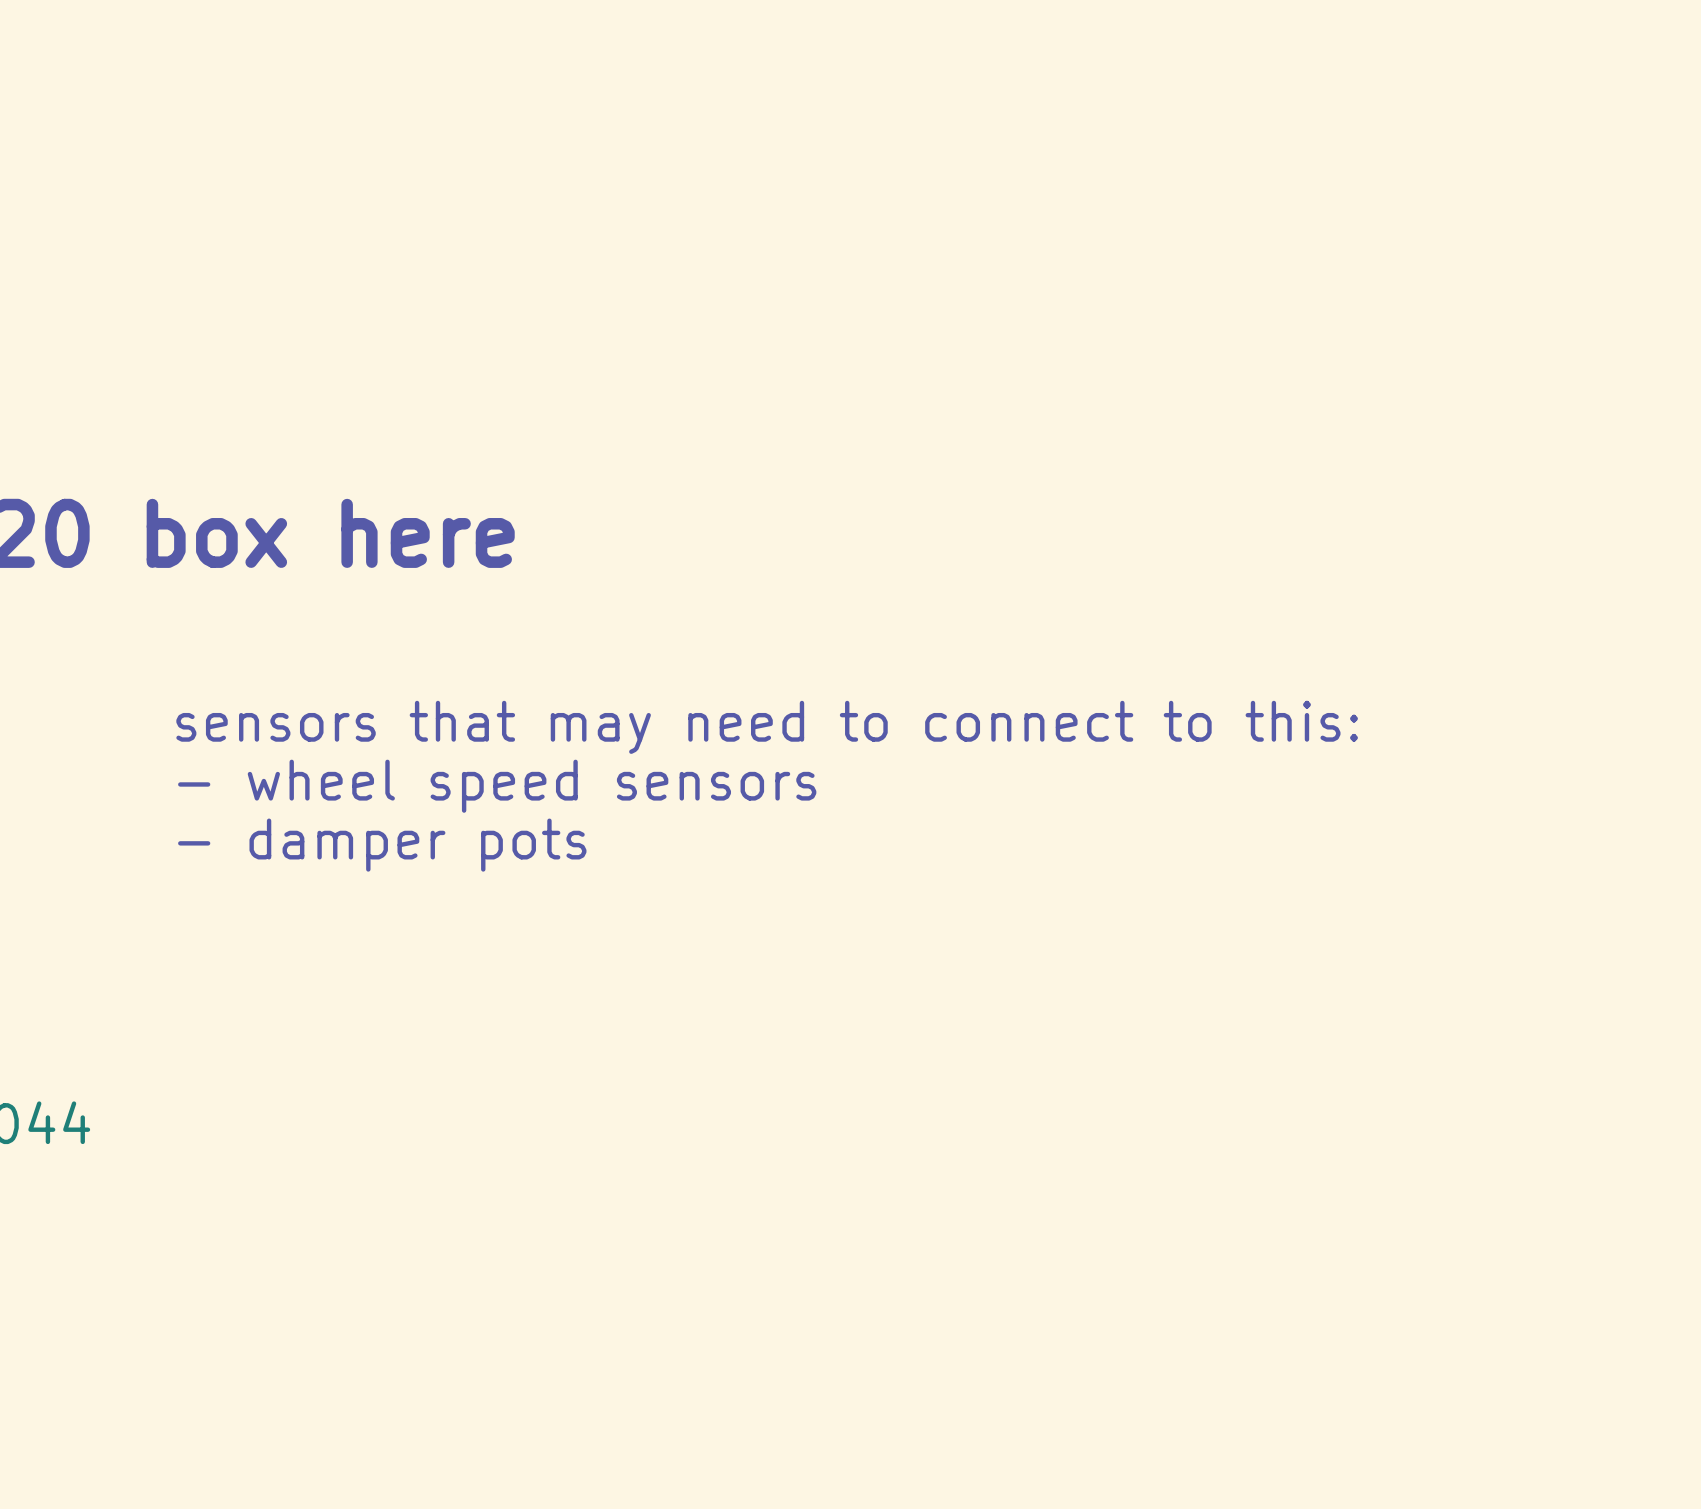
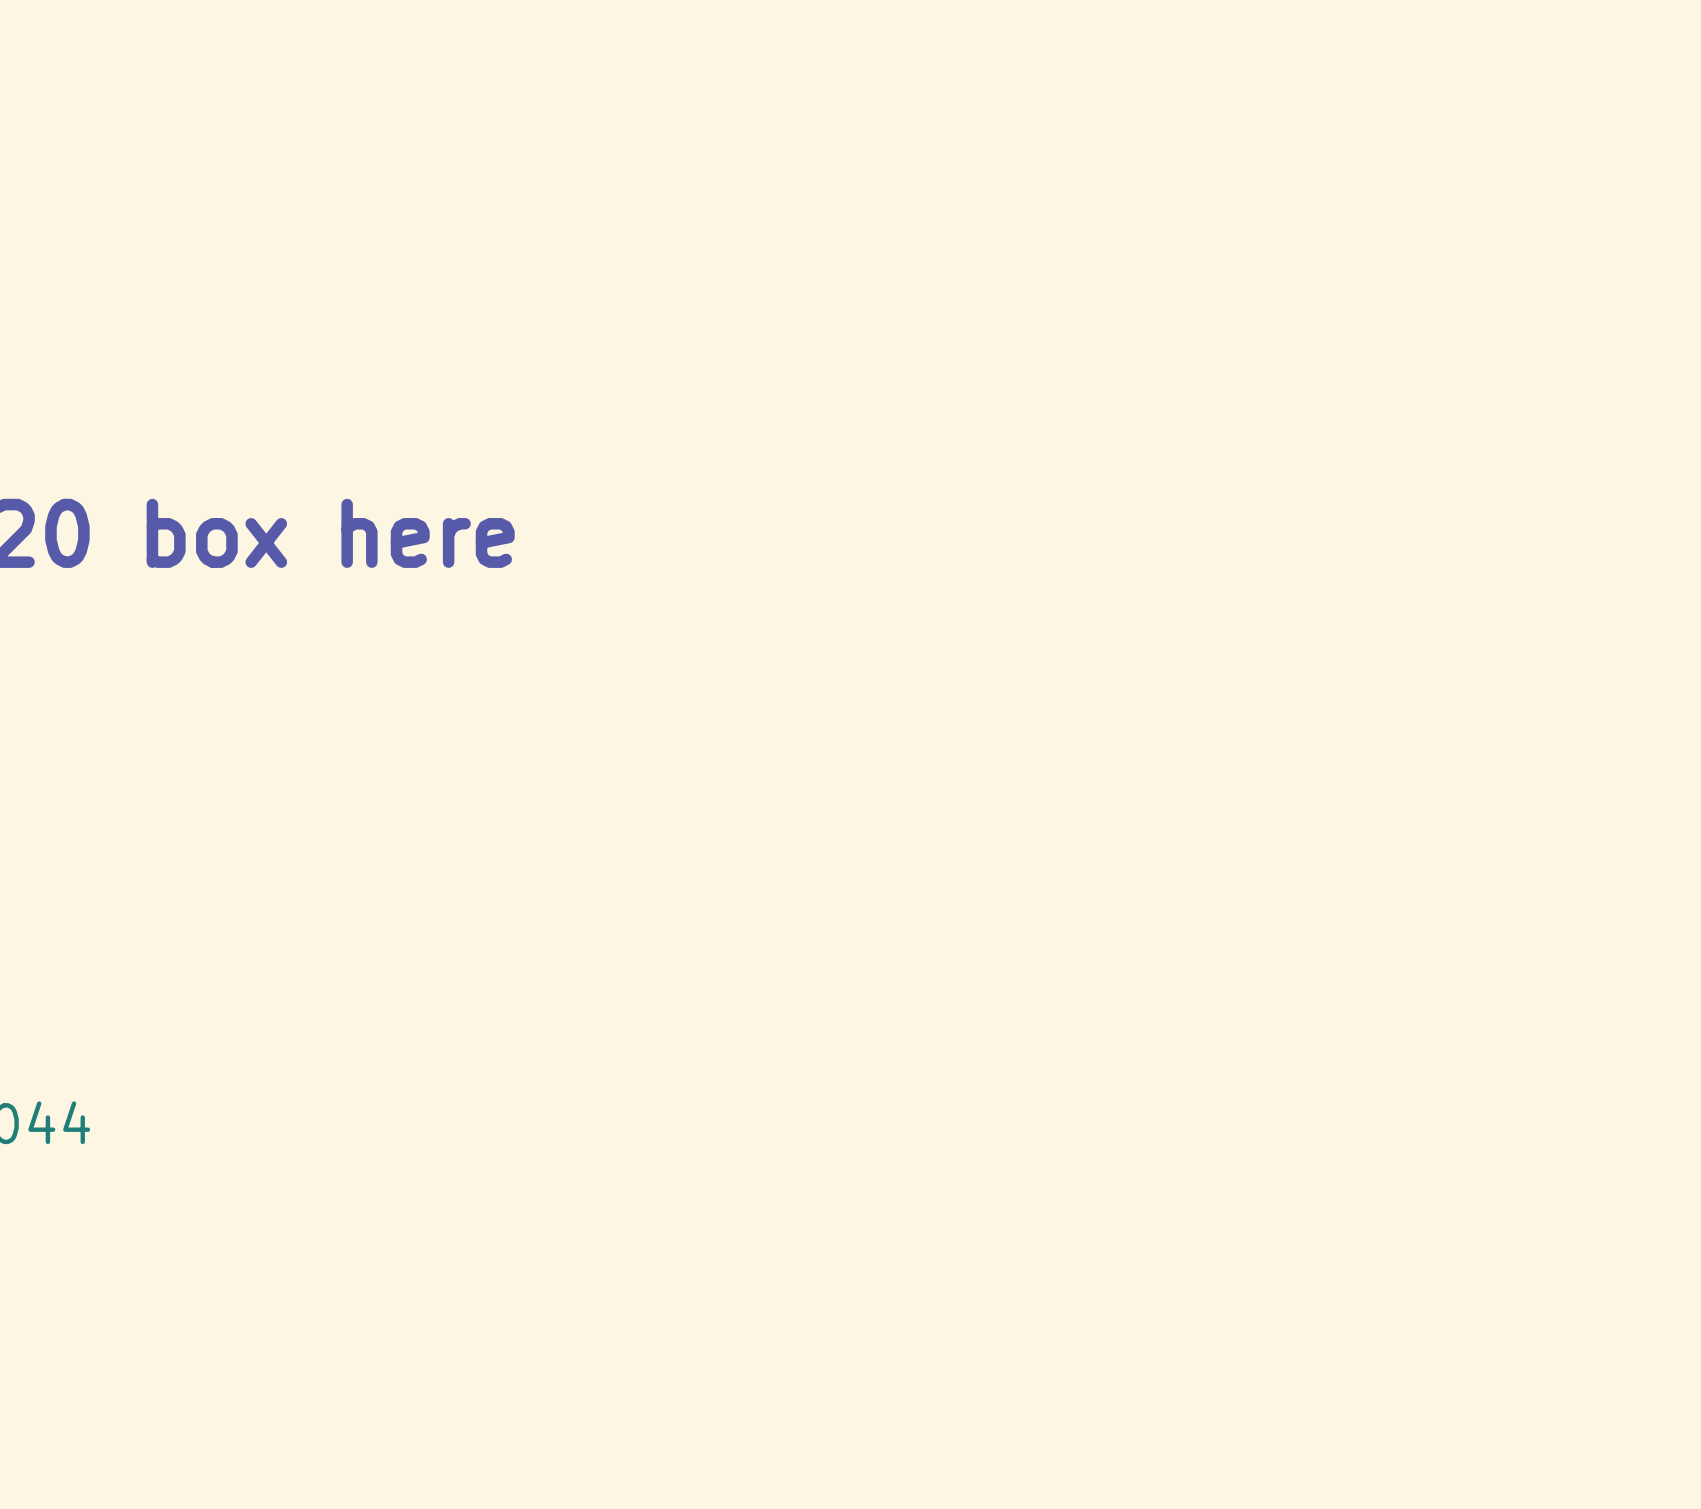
text: sensors that may need to connect to this: (767, 727) -> none
text: - wheel speed sensors (497, 786) -> none
text: - damper pots (382, 845) -> none

